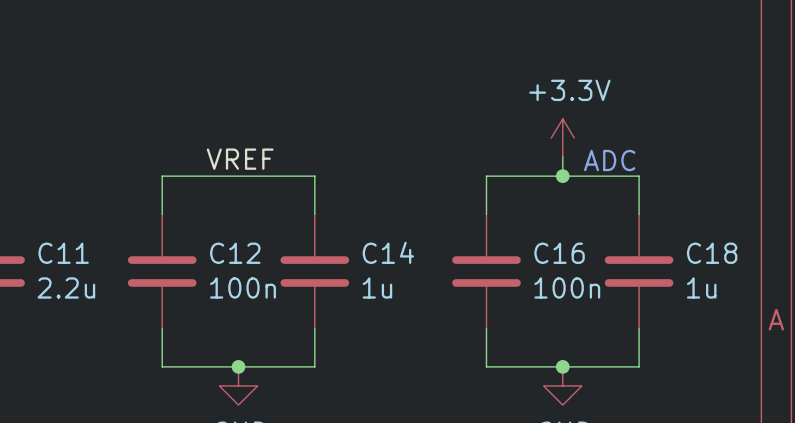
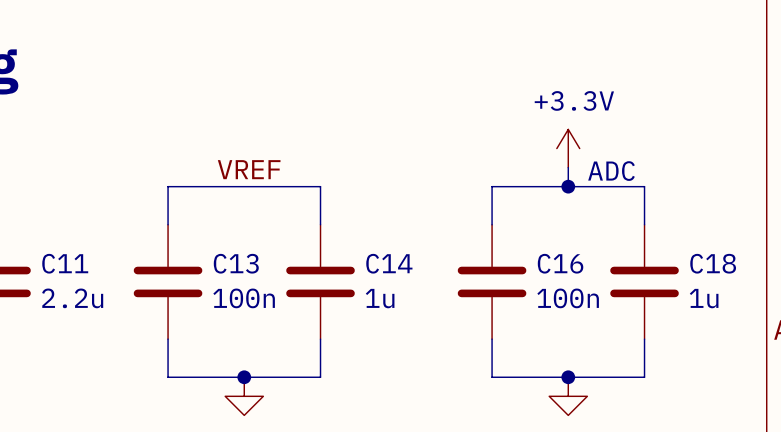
C12 name: C12 (235, 253) -> C13 (236, 263)

